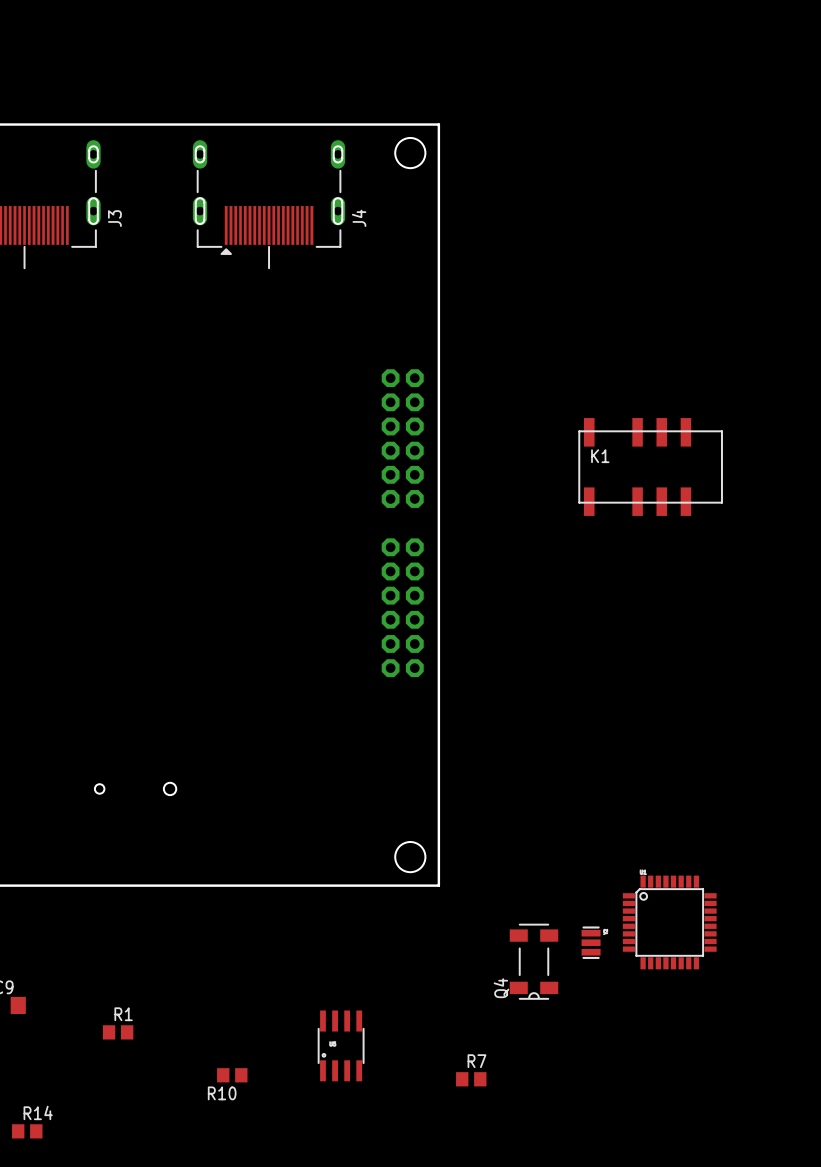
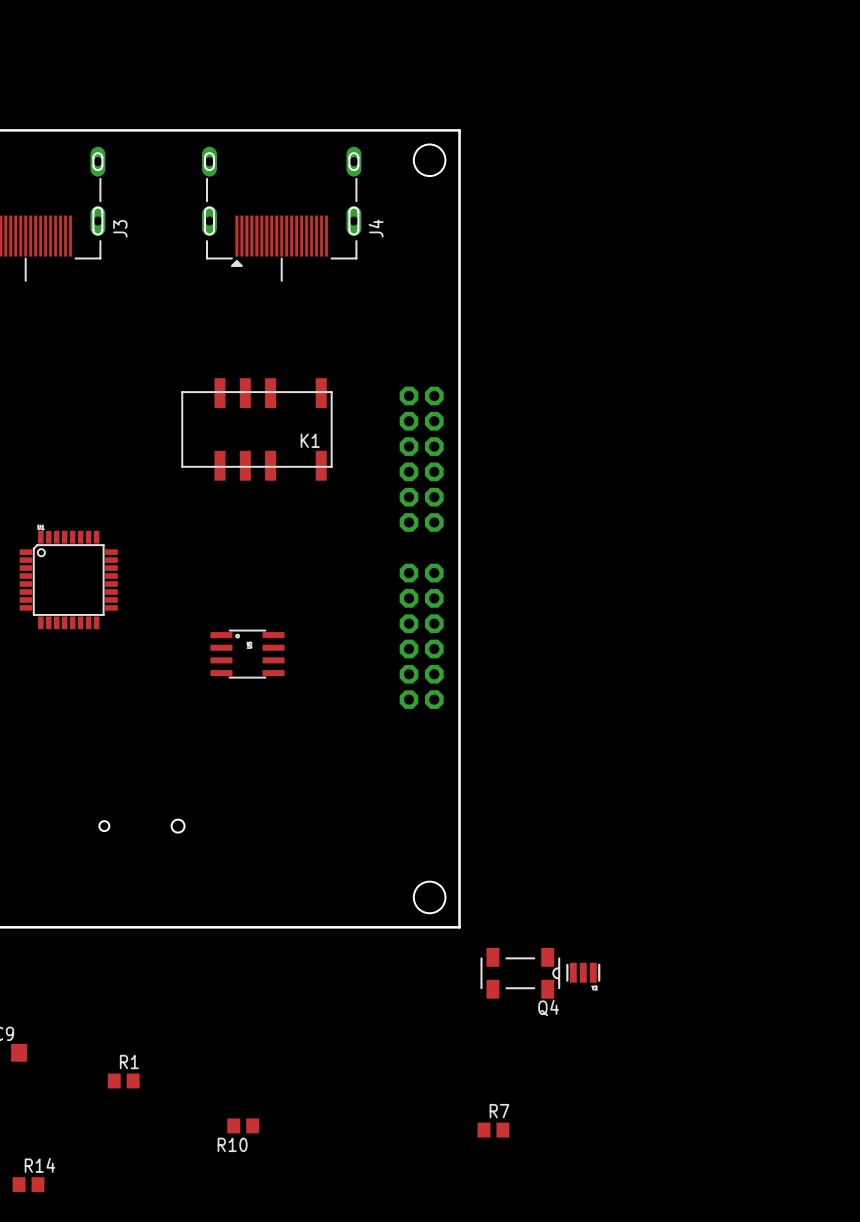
K1 rotation: 0° (650, 466) -> 180° (256, 429)
K1 position: (650, 466) -> (256, 429)
part position: (669, 922) -> (68, 580)
part rotation: 0° (591, 942) -> 90° clockwise (583, 972)
part position: (591, 942) -> (583, 972)
Q4 rotation: 0° (534, 961) -> 90° counterclockwise (520, 973)
Q4 position: (534, 961) -> (520, 973)
part rotation: 0° (341, 1045) -> 90° clockwise (247, 654)
part position: (341, 1045) -> (247, 654)

